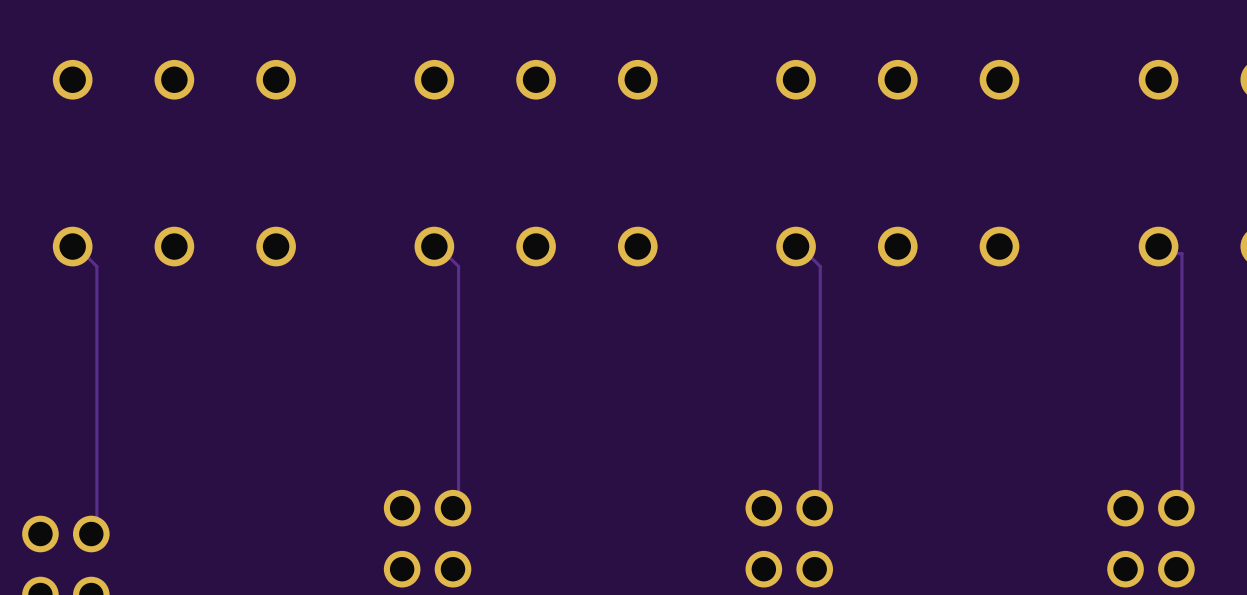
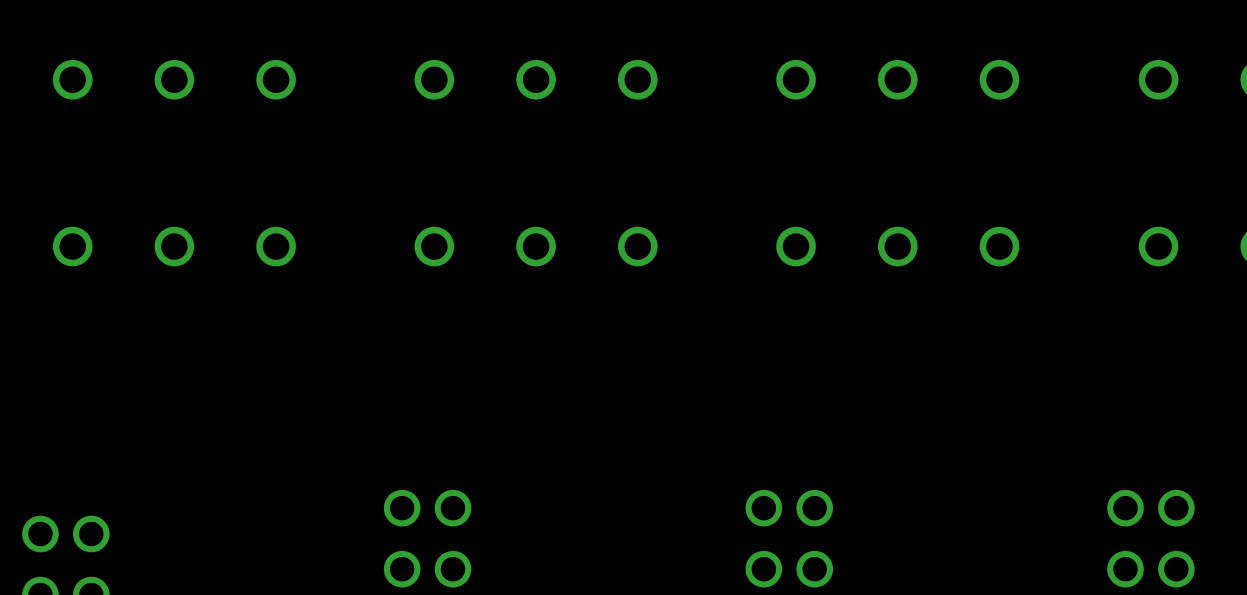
track: (72, 246) (83, 253) (96, 266) (96, 524) (91, 534) -> none
track: (434, 246) (445, 253) (458, 266) (458, 499) (453, 508) -> none
track: (796, 246) (807, 253) (820, 266) (820, 499) (814, 508) -> none
track: (1158, 246) (1169, 253) (1181, 253) (1181, 499) (1176, 508) -> none

